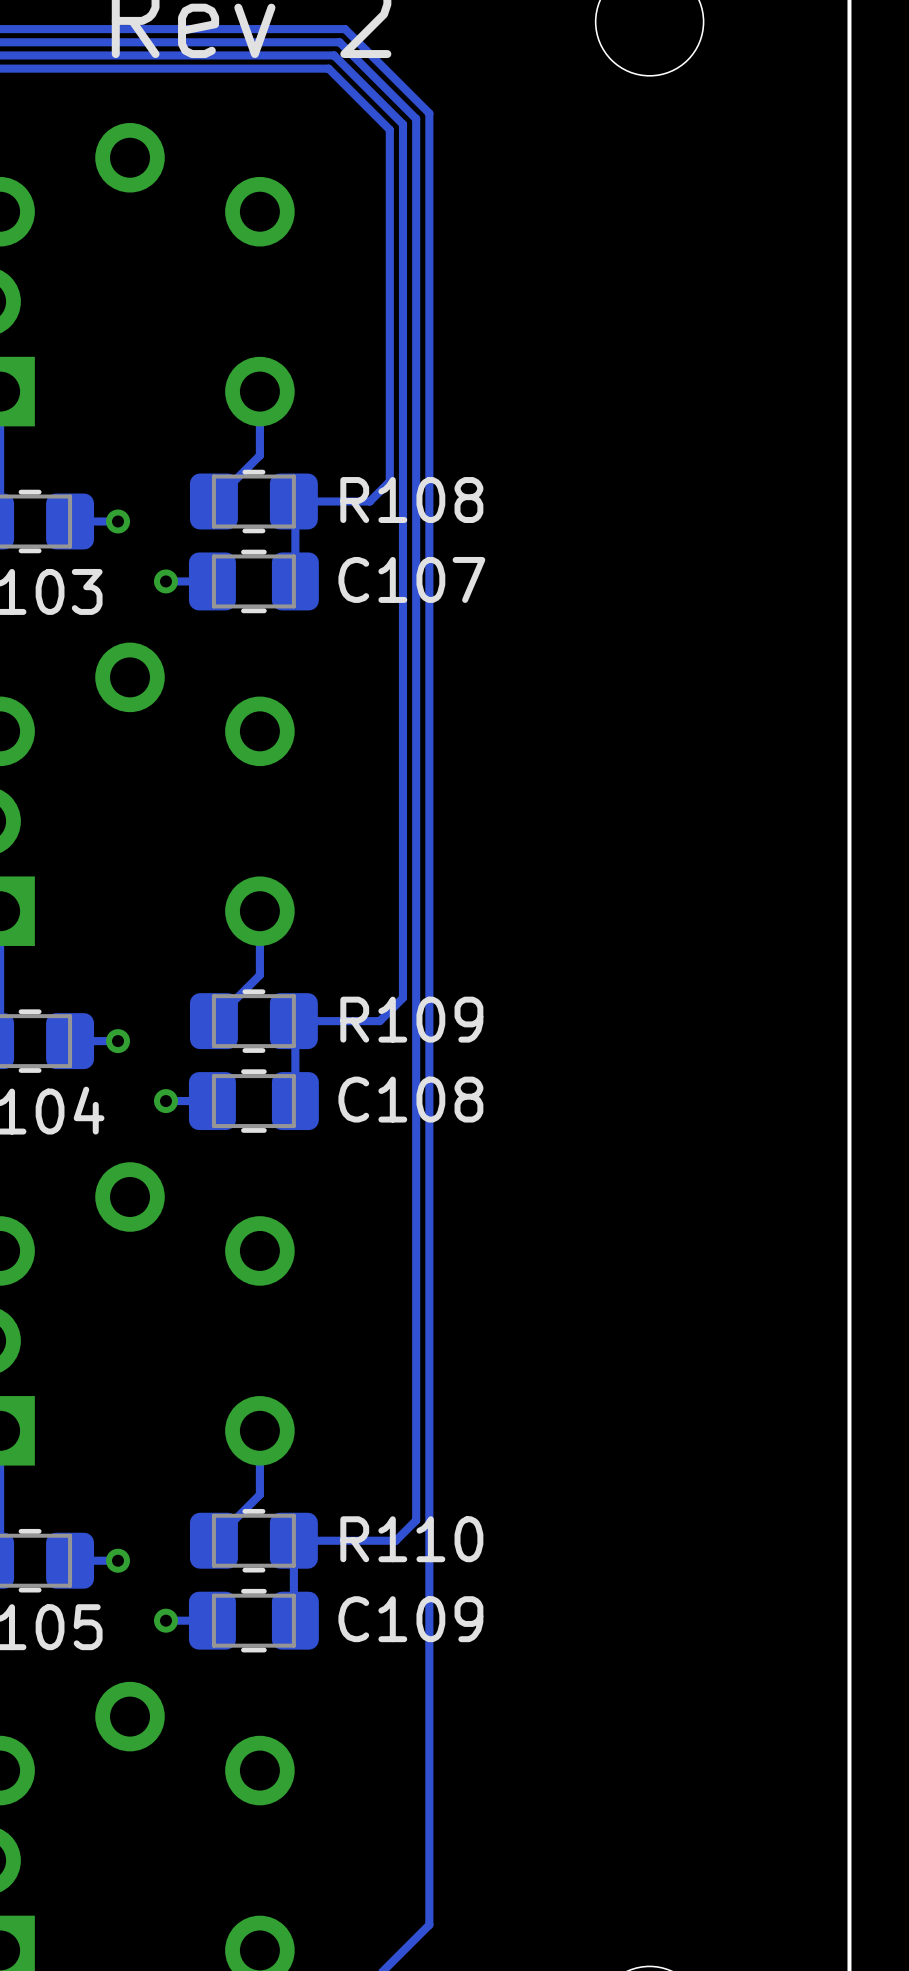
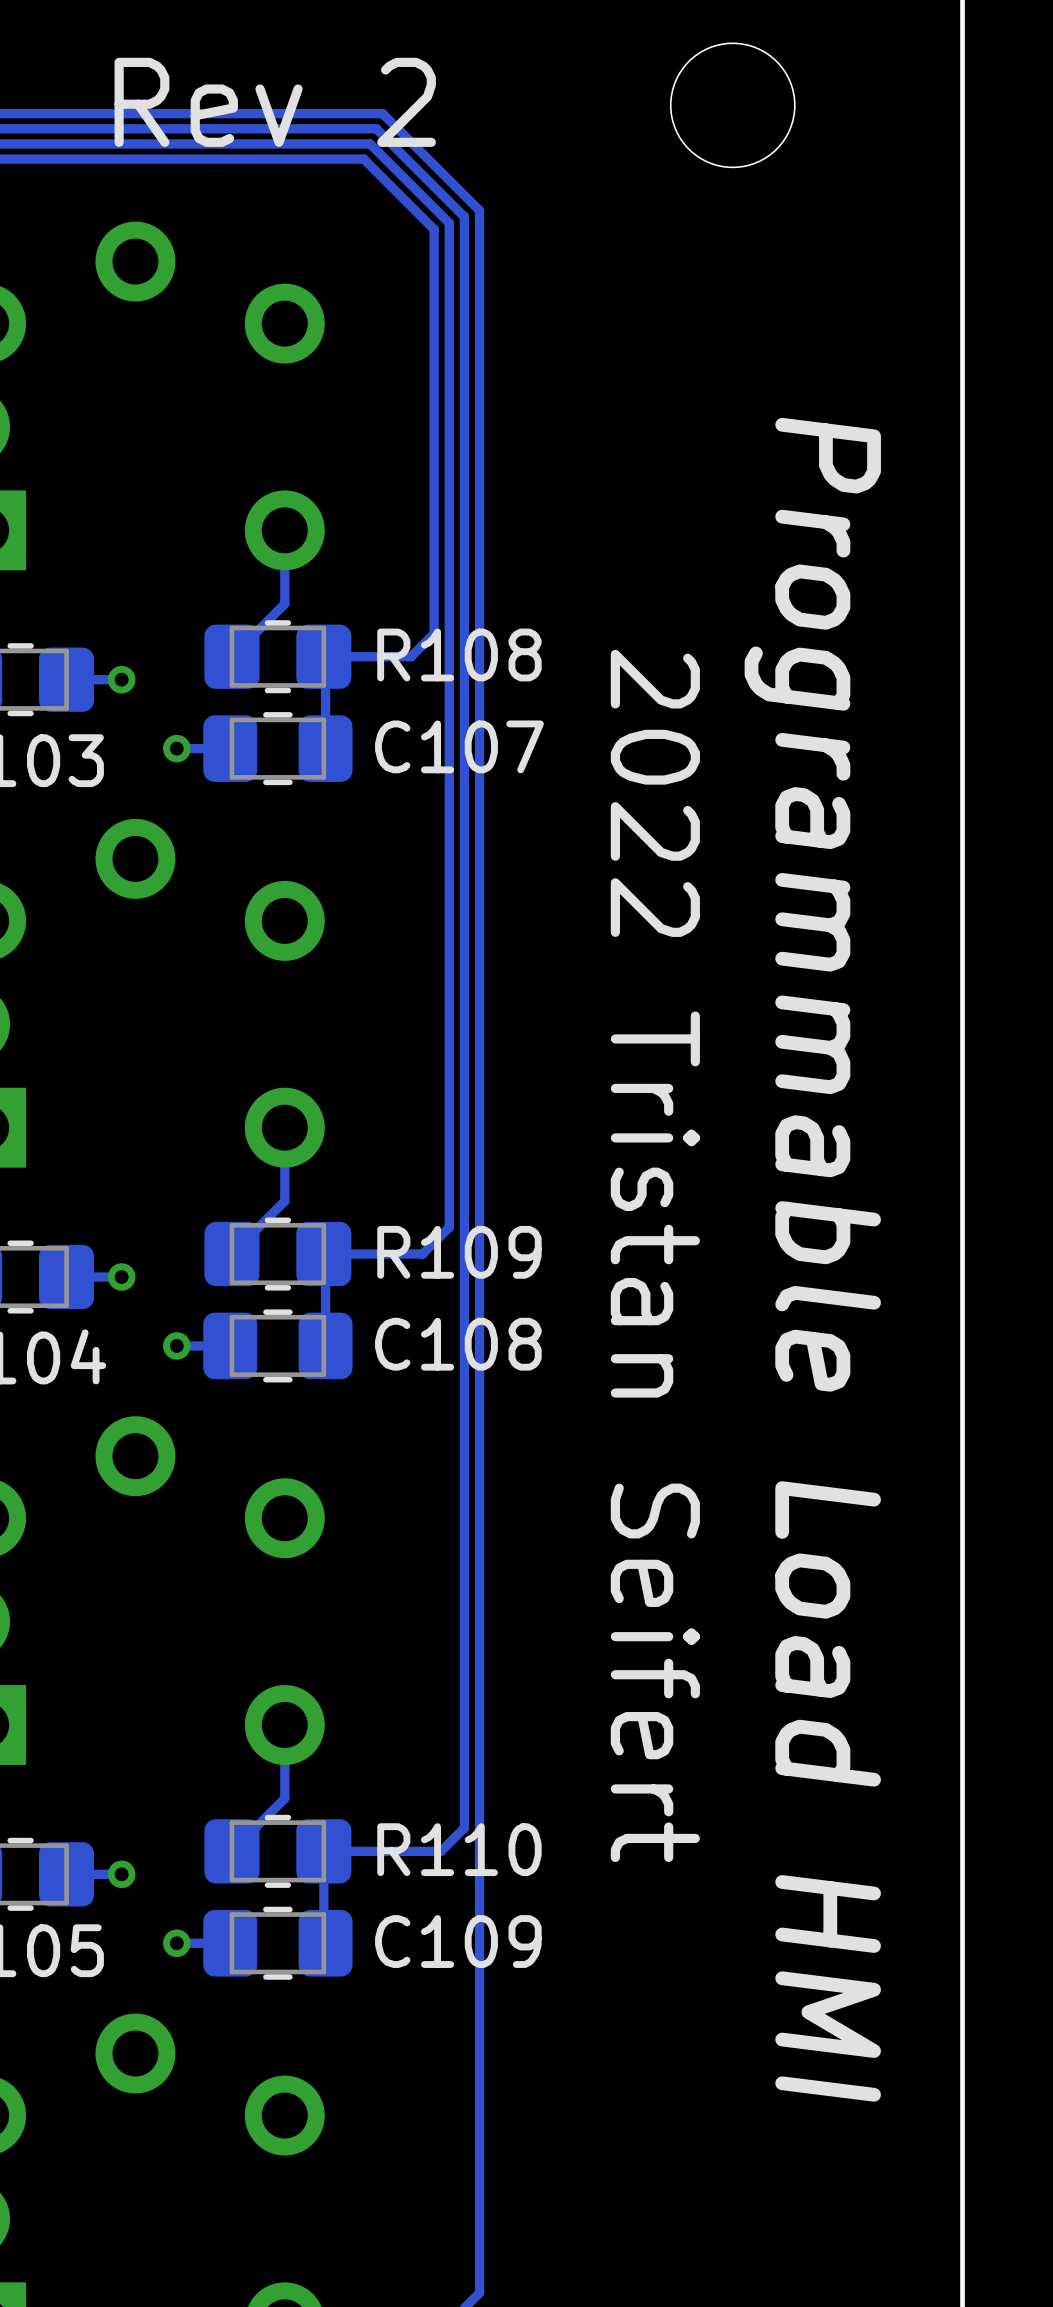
text: none -> 2022 Tristan Seifert (655, 1255)
text: none -> Programmable Load HMI (812, 1259)

